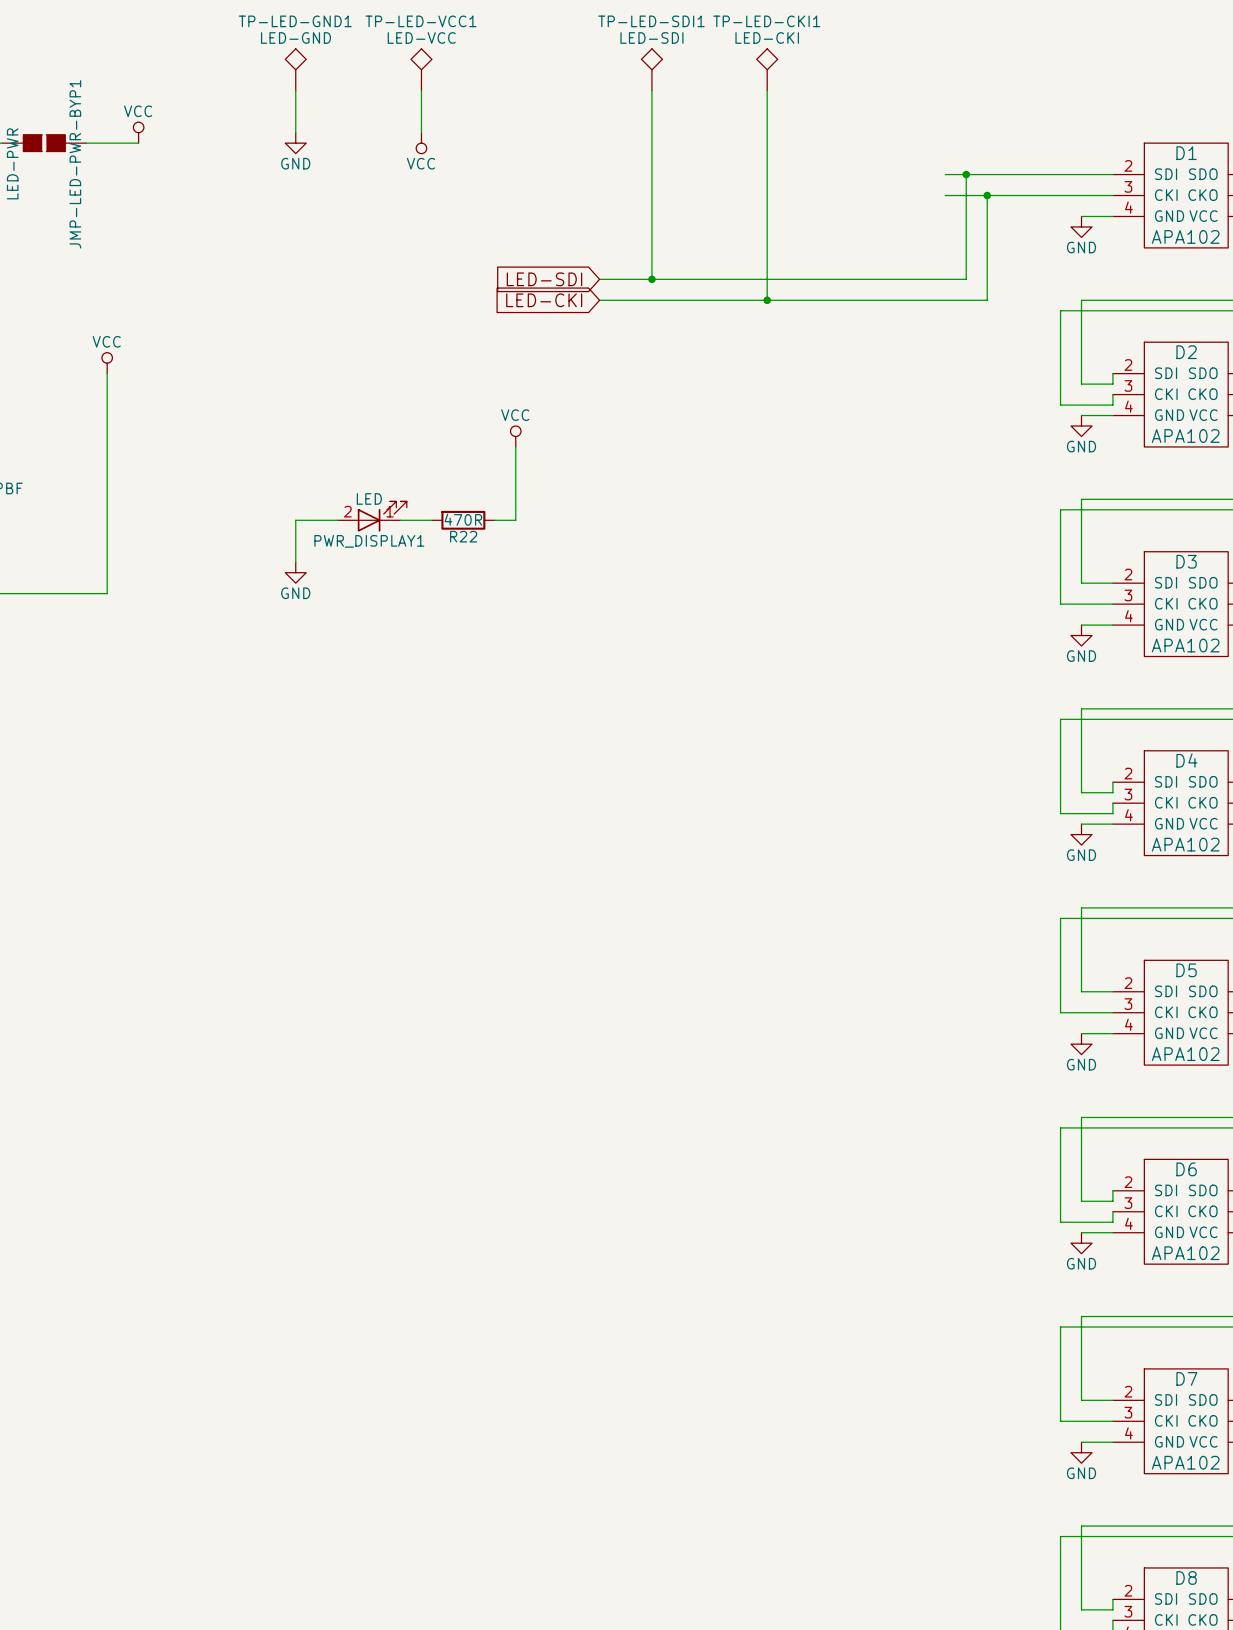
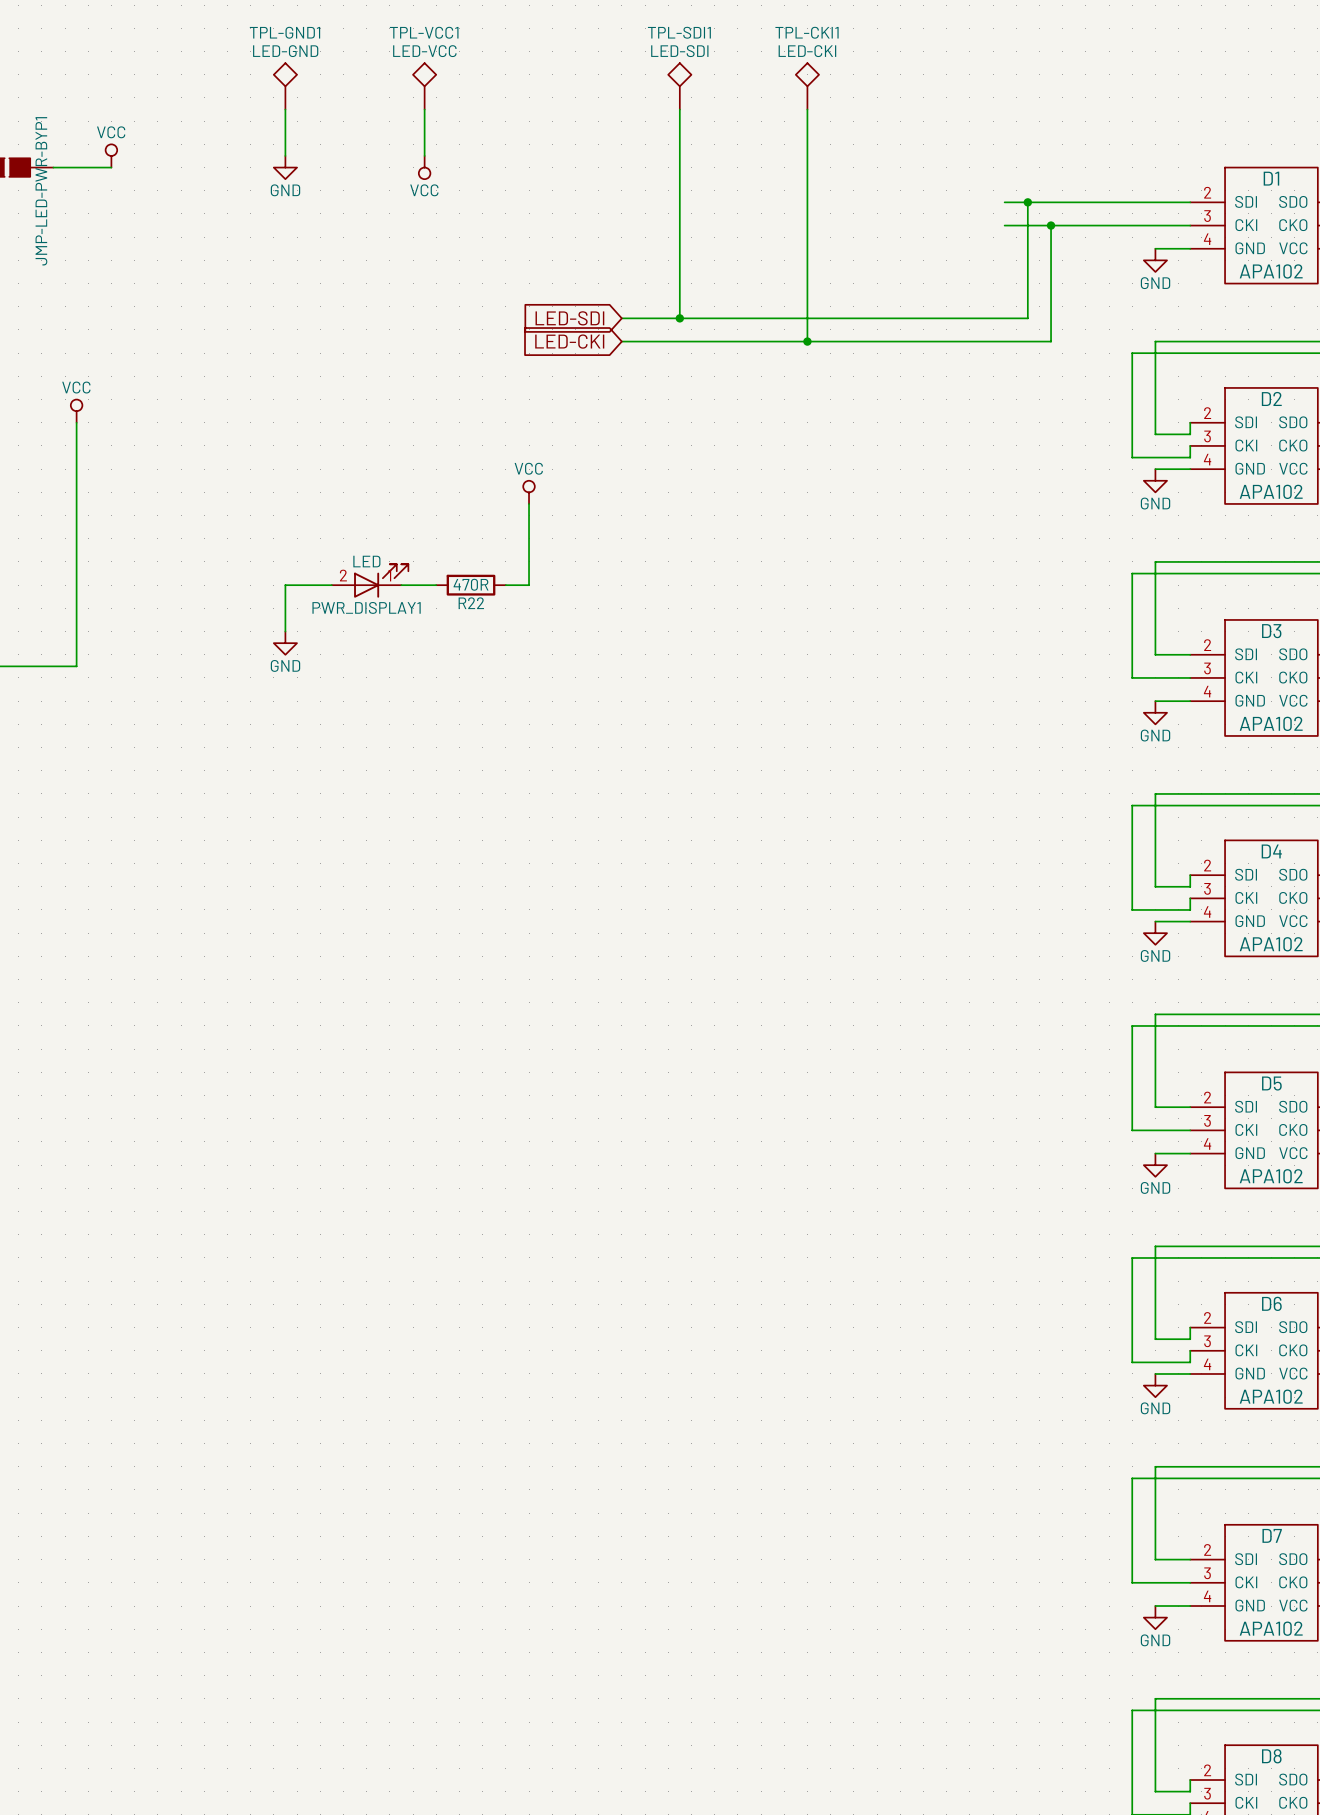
TP-LED-GND1 name: TP-LED-GND1 (295, 21) -> TPL-GND1 (284, 32)
TP-LED-VCC1 name: TP-LED-VCC1 (420, 21) -> TPL-VCC1 (424, 32)
TP-LED-SDI1 name: TP-LED-SDI1 (651, 21) -> TPL-SDI1 (679, 32)
TP-LED-CKI1 name: TP-LED-CKI1 (766, 21) -> TPL-CKI1 (807, 32)

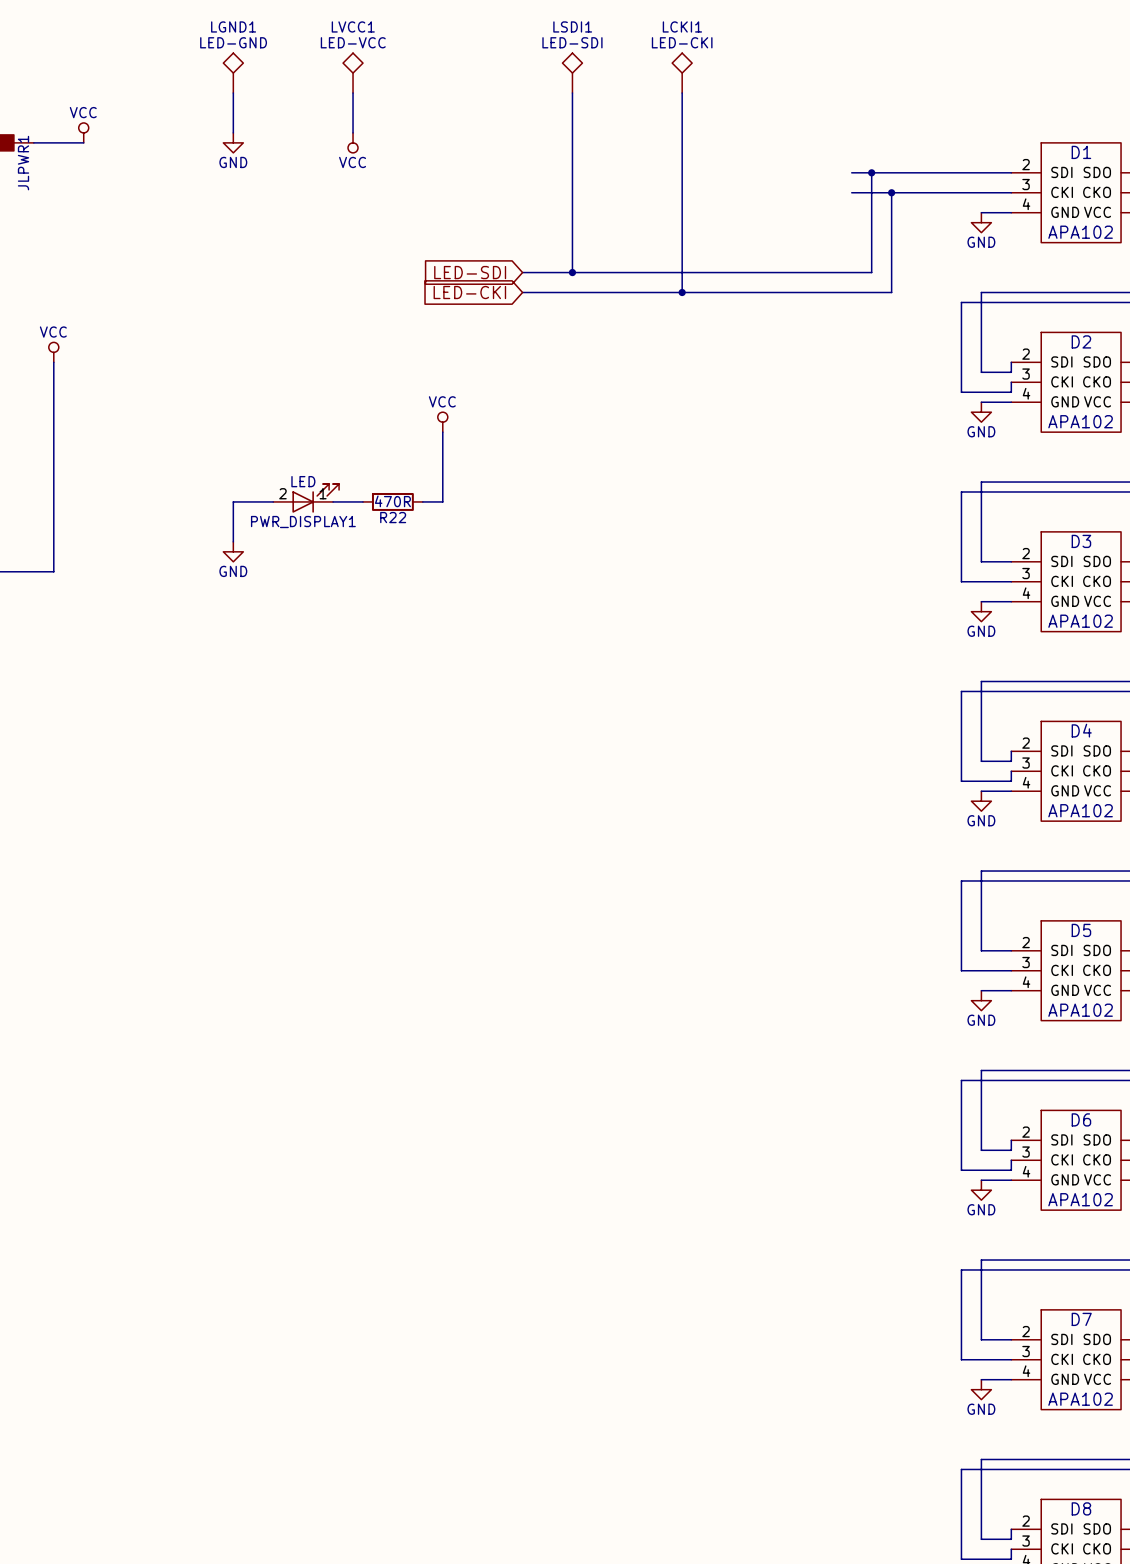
TPL-GND1 name: TPL-GND1 (284, 32) -> LGND1 (233, 26)
TPL-VCC1 name: TPL-VCC1 (424, 32) -> LVCC1 (353, 26)
TPL-SDI1 name: TPL-SDI1 (679, 32) -> LSDI1 (572, 26)
TPL-CKI1 name: TPL-CKI1 (807, 32) -> LCKI1 (682, 26)
JMP-LED-PWR-BYP1 name: JMP-LED-PWR-BYP1 (41, 191) -> JLPWR1 (23, 163)

